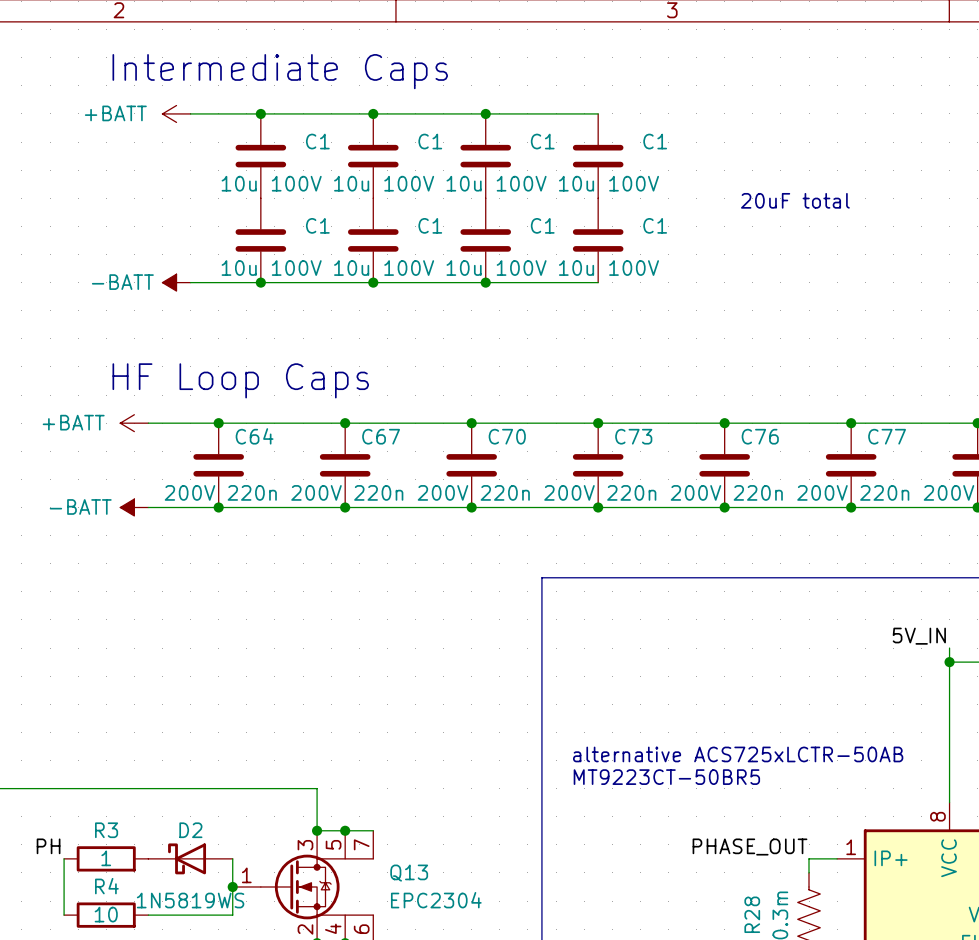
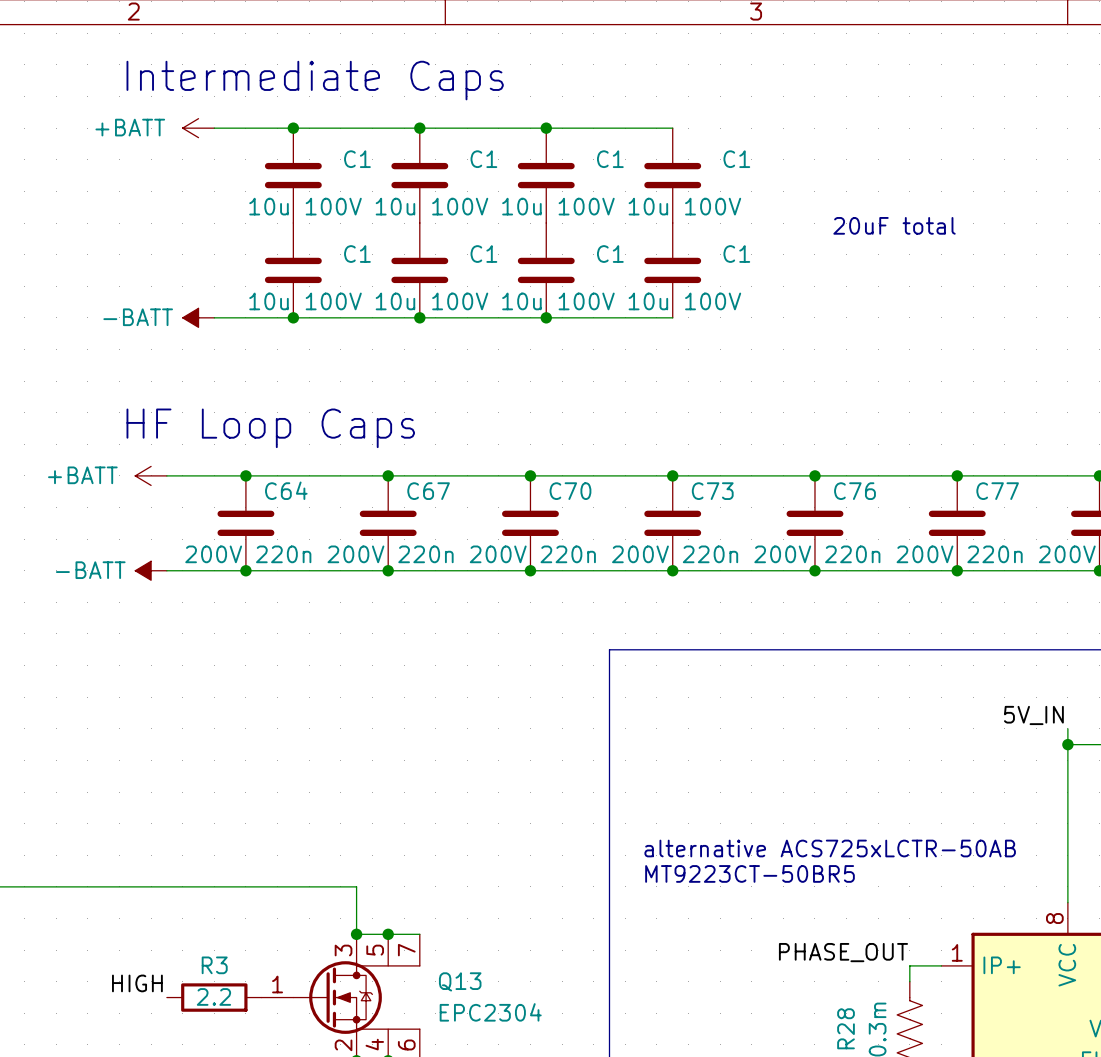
label: PH (48, 846) -> none
wire: (64, 858) (64, 915) -> none
R3 position: (106, 858) -> (214, 997)
R3 value: 1 (106, 858) -> 2.2 (213, 996)
D2: 1N5819WS (190, 858) -> none
wire: (232, 858) (232, 915) (148, 915) -> none
label: none -> HIGH (137, 983)
junction: (232, 886) -> none
R4: 10 (106, 915) -> none

